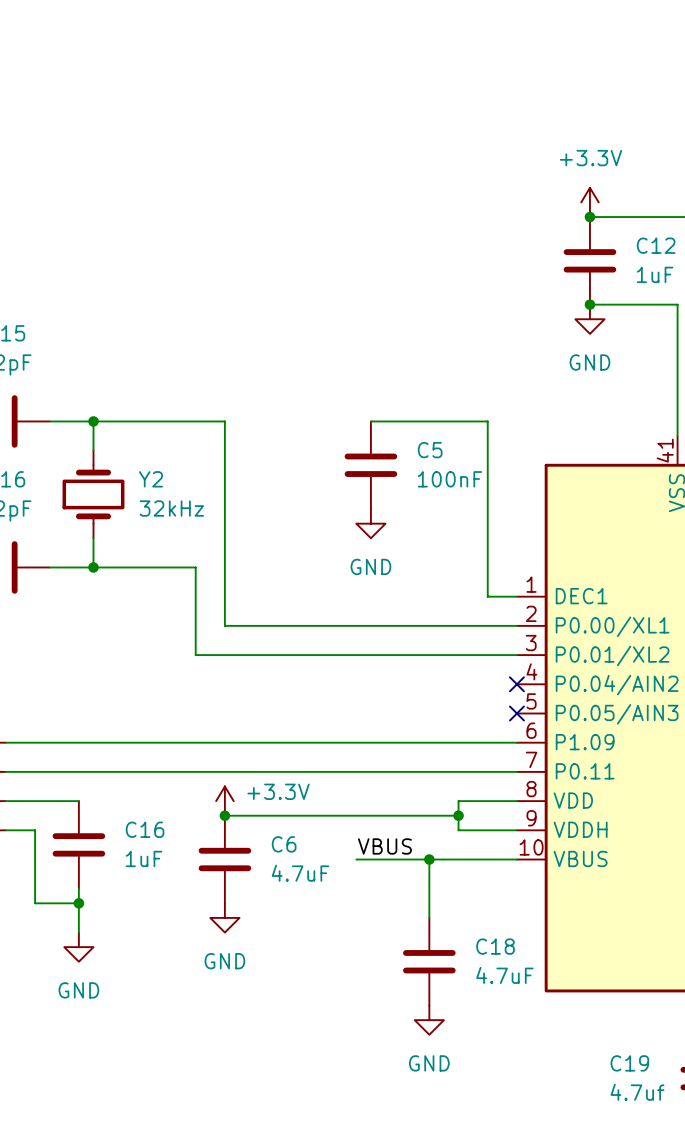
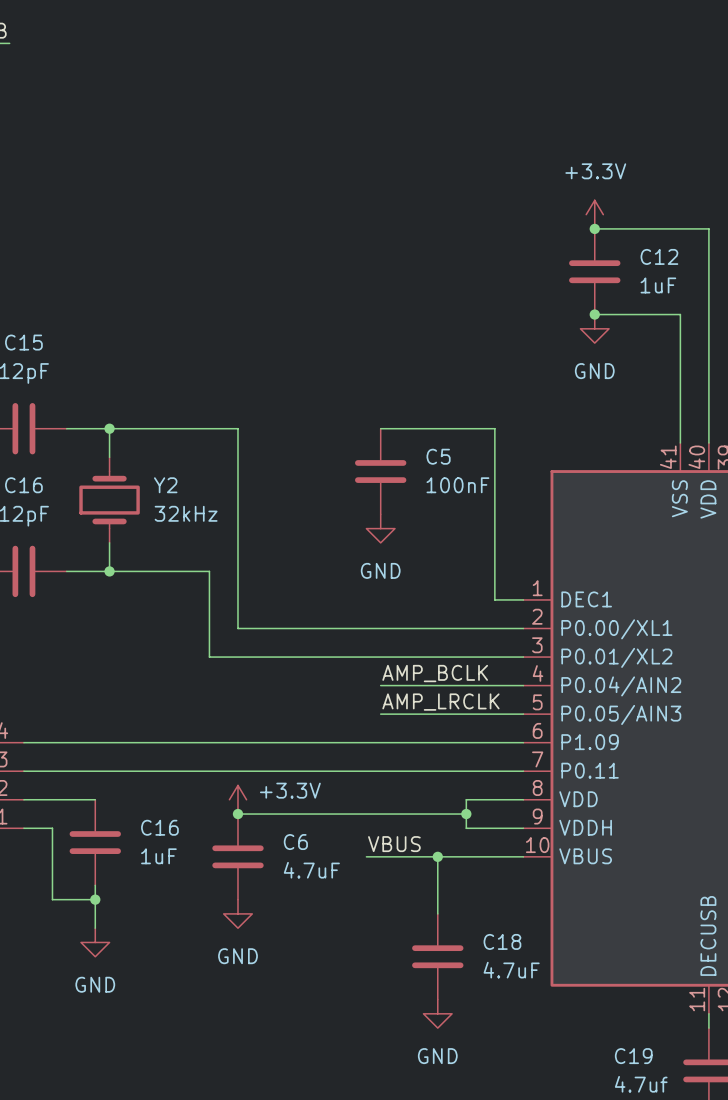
label: none -> AMP_BCLK (435, 673)
wire: none -> (380, 685) (523, 685)
no-connect mark: (516, 684) -> none
label: none -> AMP_LRCLK (440, 702)
wire: none -> (380, 714) (523, 714)
no-connect mark: (516, 713) -> none

